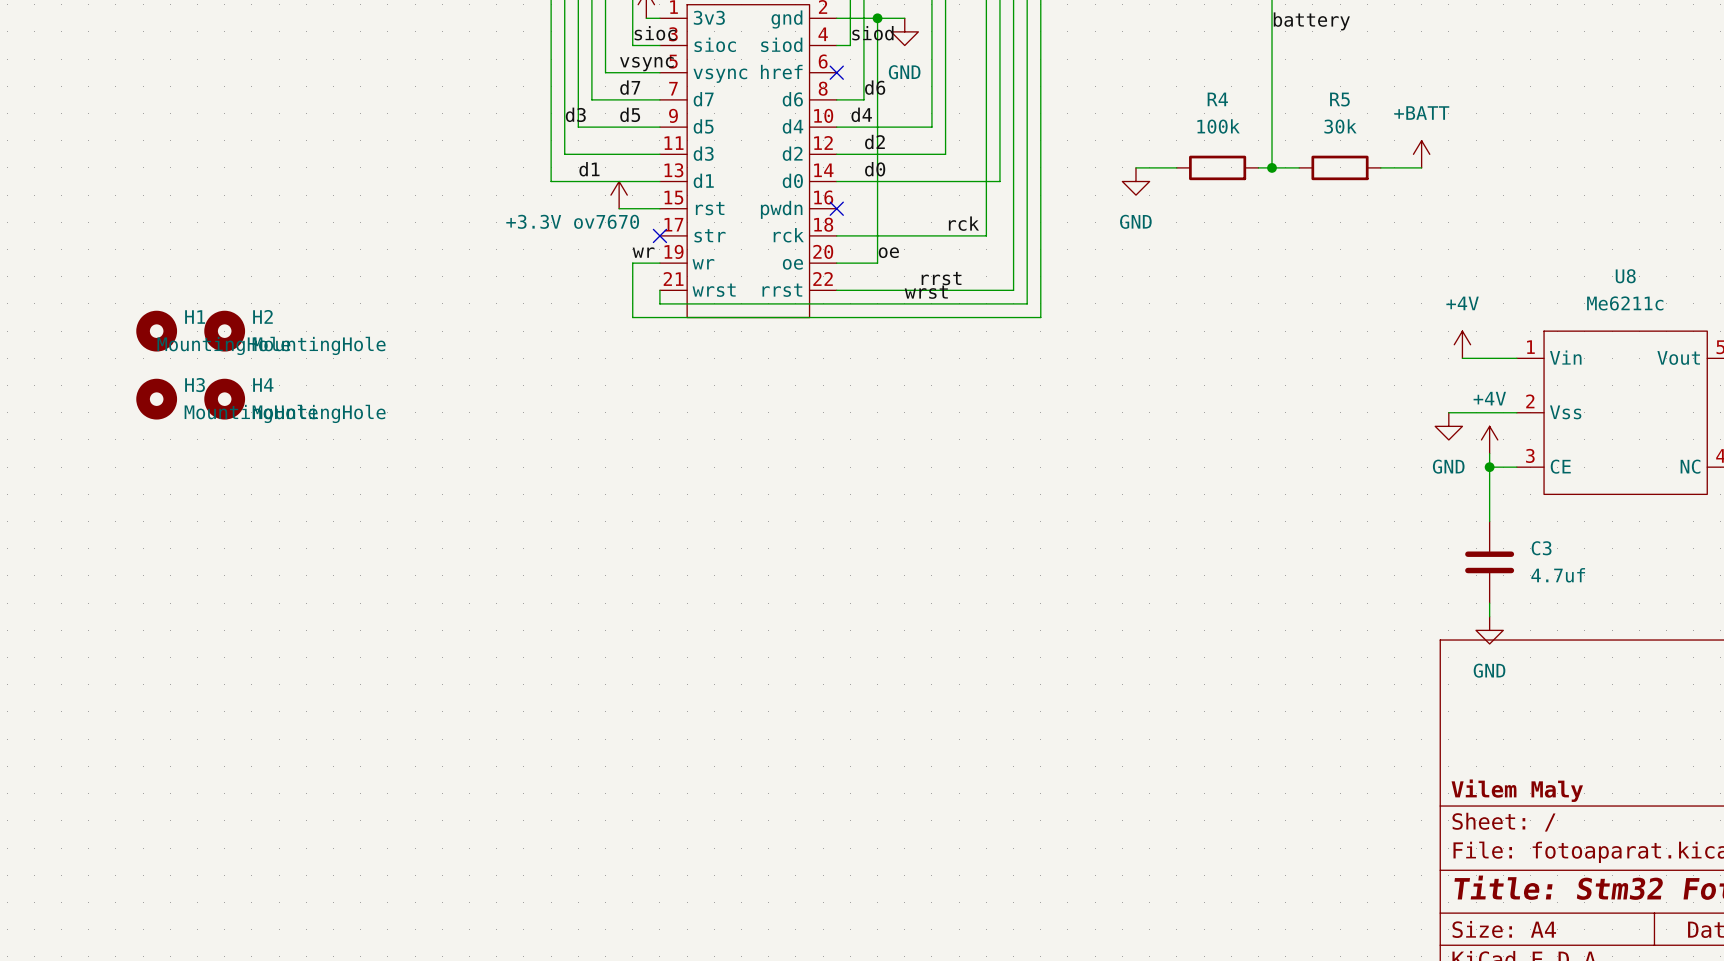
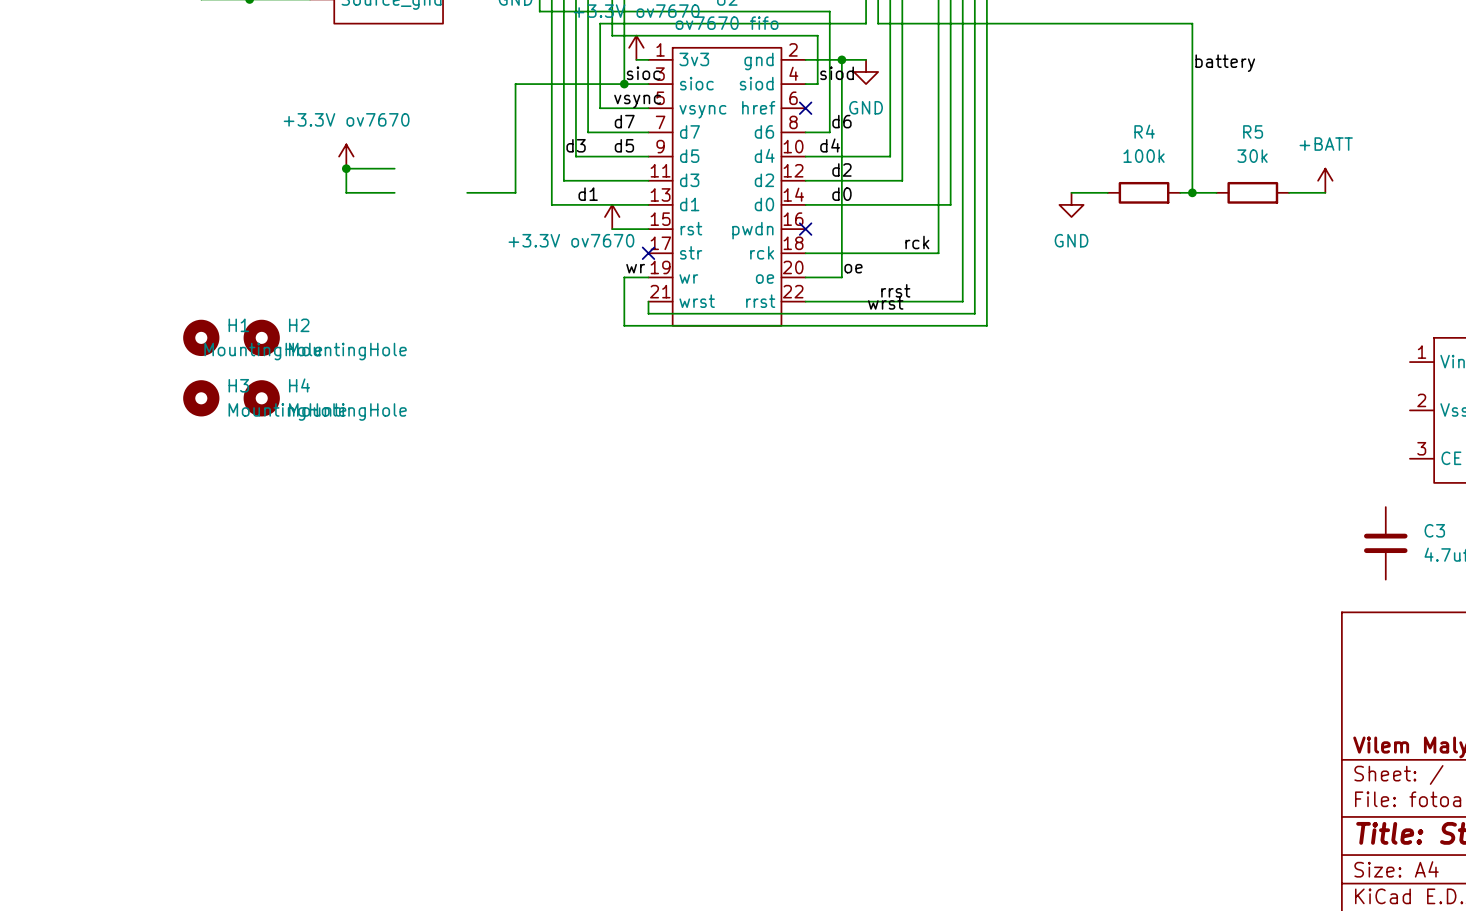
wire: none -> (624, 84) (515, 84) (515, 192) (467, 192)
junction: none -> (624, 84)
power symbol: none -> +3.3V ov7670 (346, 156)
junction: none -> (346, 168)
wire: none -> (394, 168) (346, 168) (346, 192) (394, 192)
power symbol: +4V (1462, 344) -> none
wire: (1462, 358) (1516, 358) -> none
wire: (1448, 412) (1516, 412) -> none
power symbol: GND (1448, 426) -> none
power symbol: +4V (1489, 439) -> none
wire: (1489, 453) (1489, 521) -> none
wire: (1489, 467) (1516, 467) -> none
junction: (1489, 467) -> none
wire: (1489, 603) (1489, 616) -> none
power symbol: GND (1489, 630) -> none

